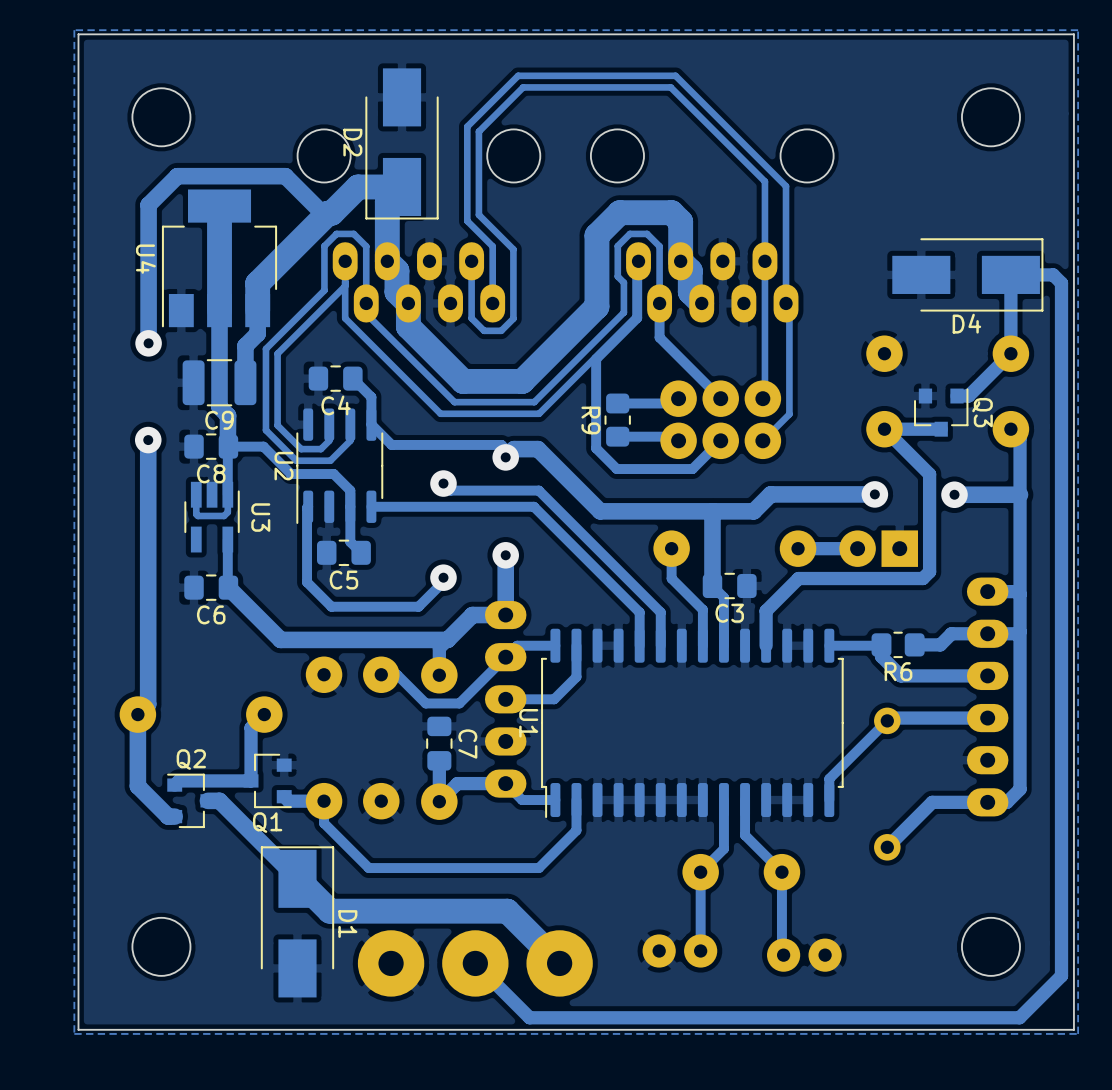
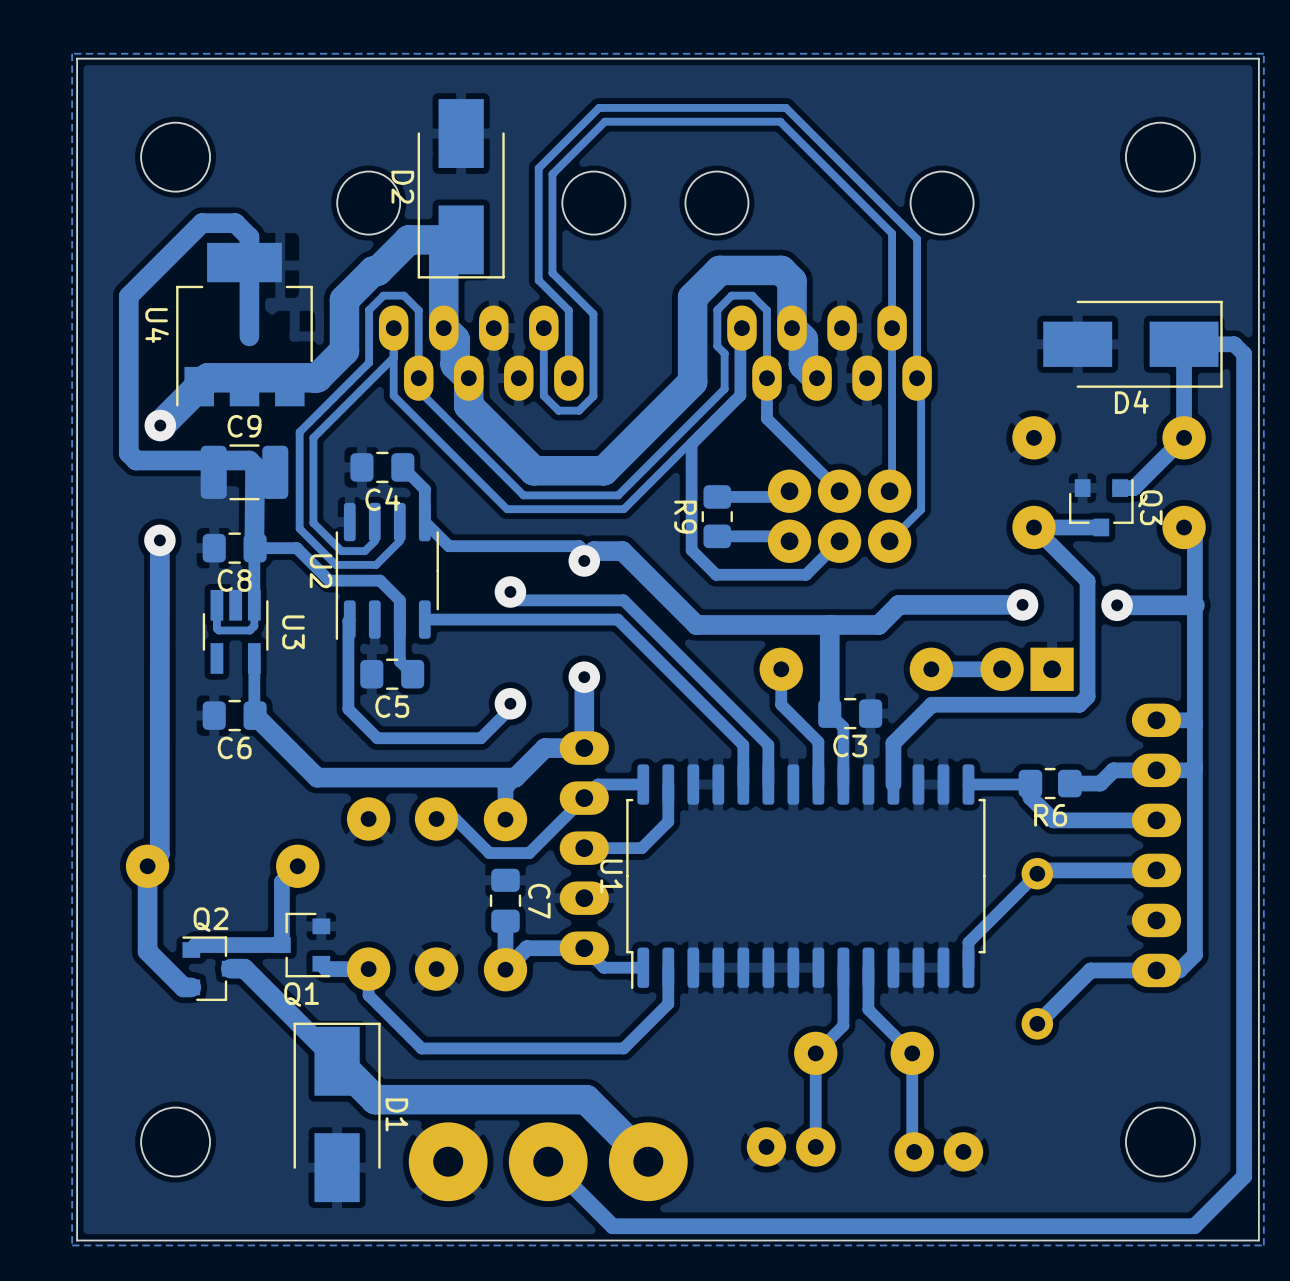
track: (219, 206) (219, 407) (228, 415) -> (249, 336) (249, 237) (235, 223) (201, 223) (128, 296) (128, 453) (136, 460) (249, 460) (255, 466) (254, 511)
track: (328, 213) (322, 213) (285, 176) (177, 176) (148, 204) (148, 343) -> (344, 299) (344, 350) (317, 377) (208, 377) (160, 425)
track: (303, 237) (257, 283) (257, 333) (245, 345) (245, 366) -> none
C9 name position: C9 (219, 420) -> C9 (244, 426)

